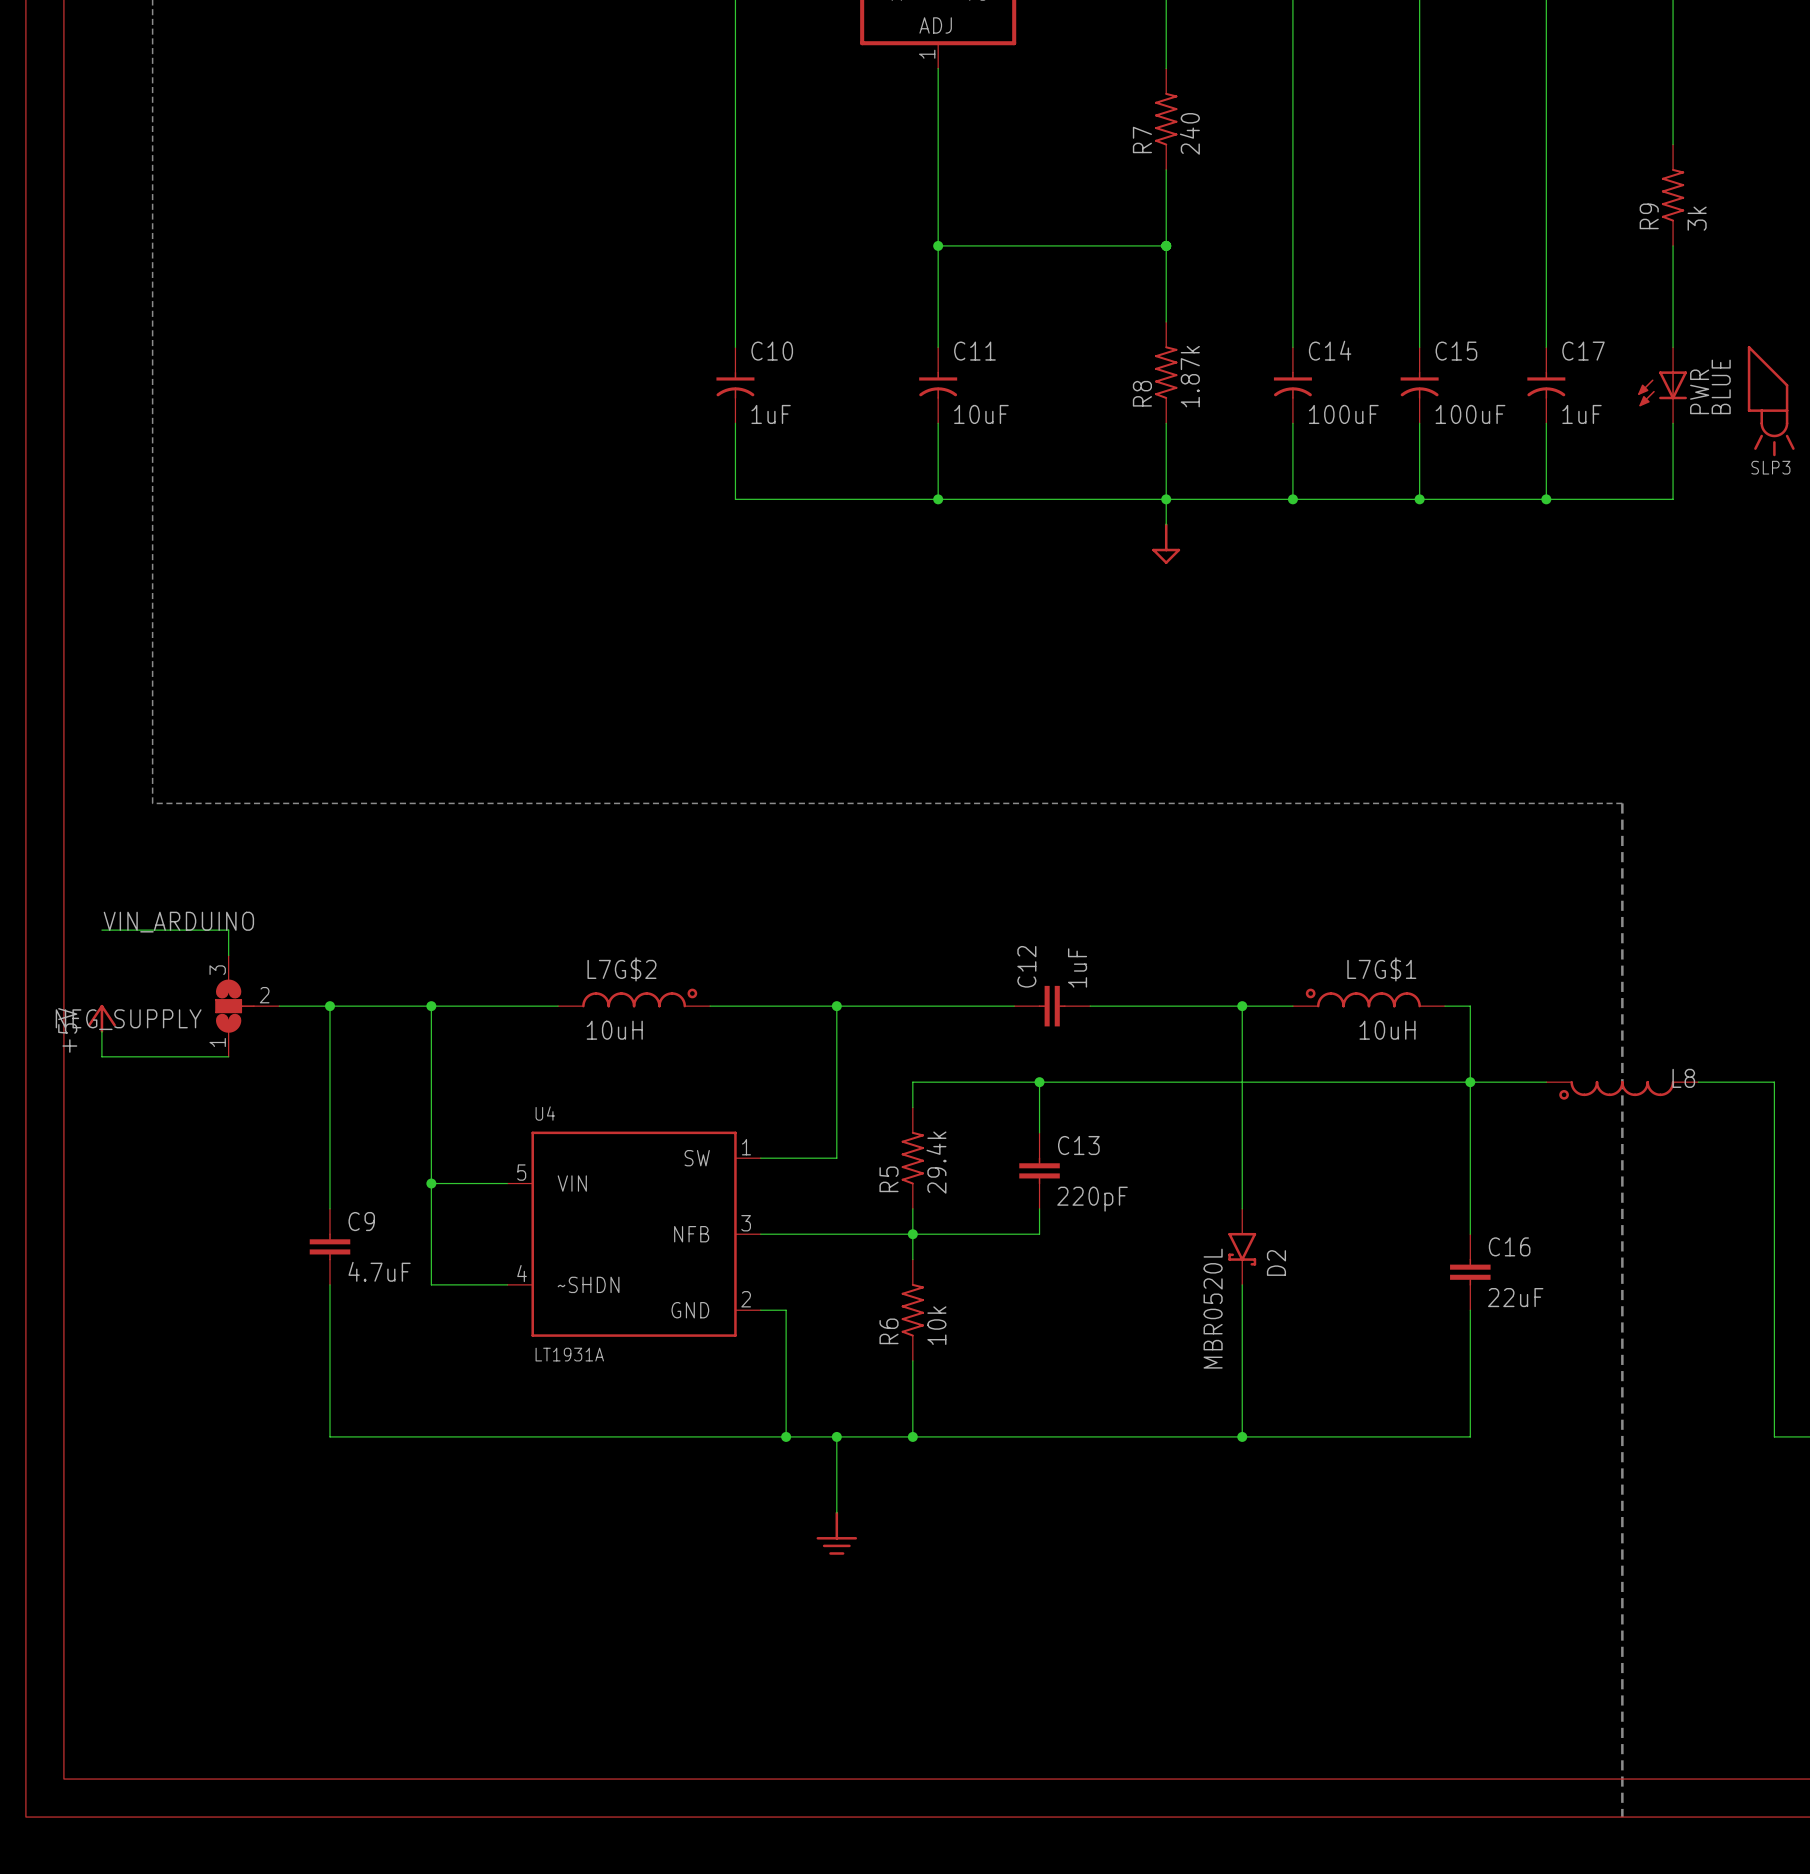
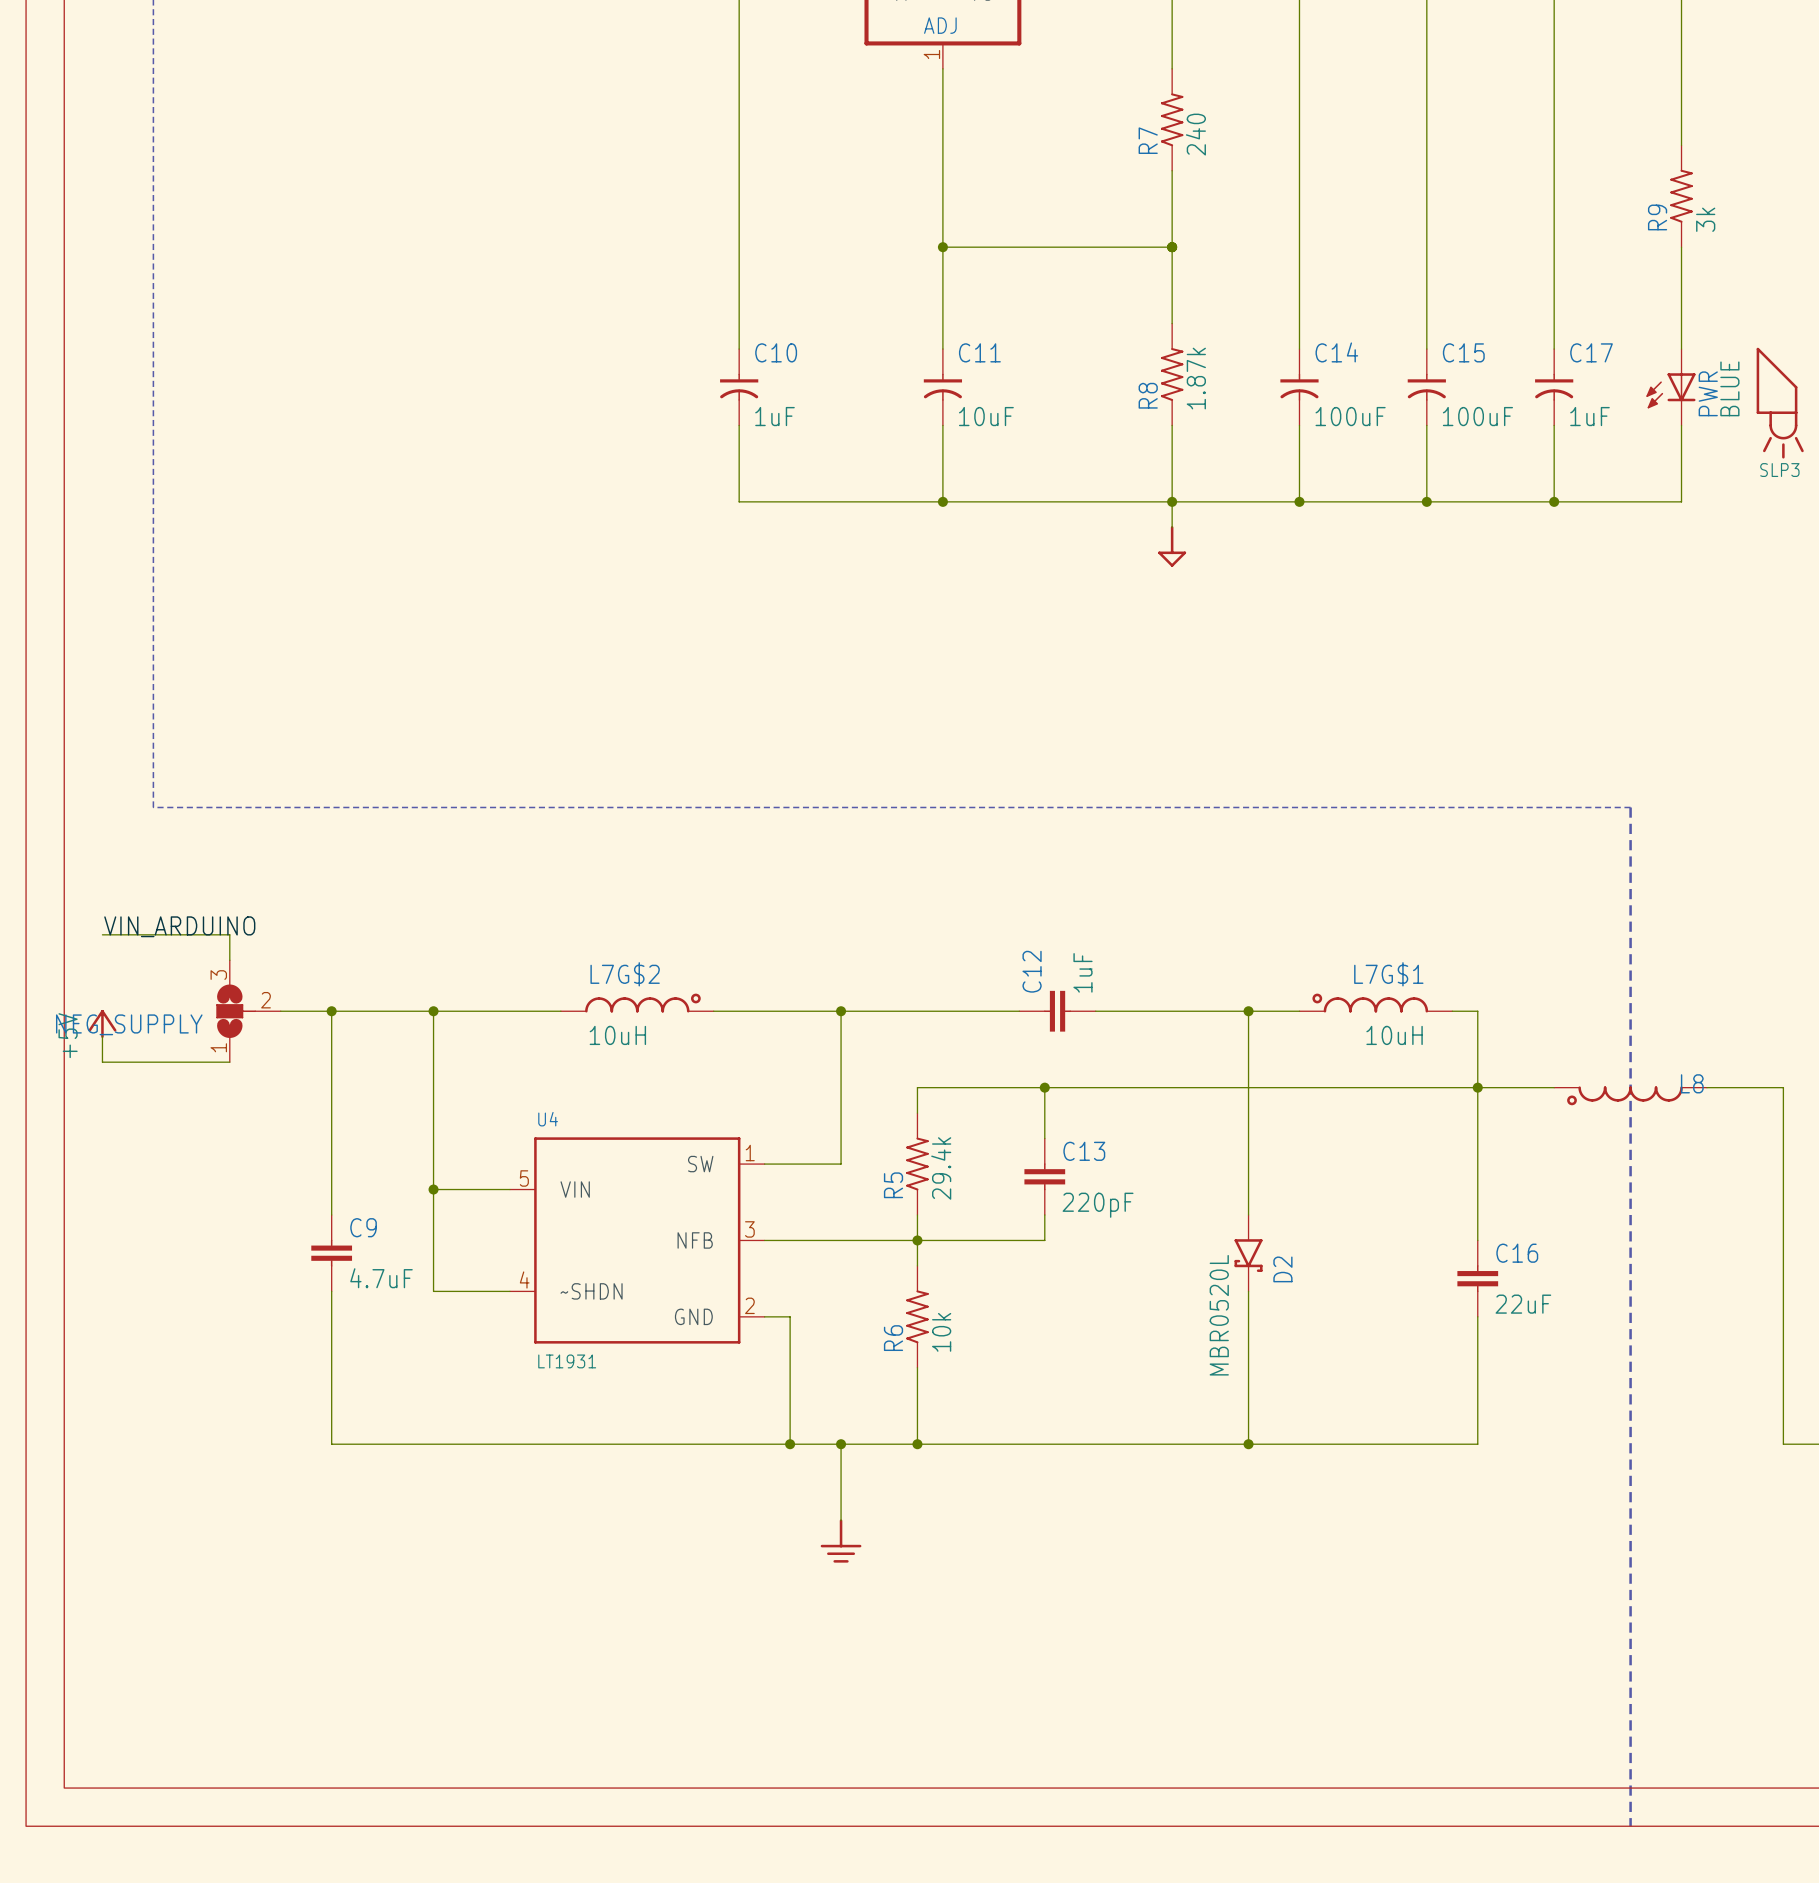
U4 value: LT1931A (569, 1354) -> LT1931 (567, 1361)

